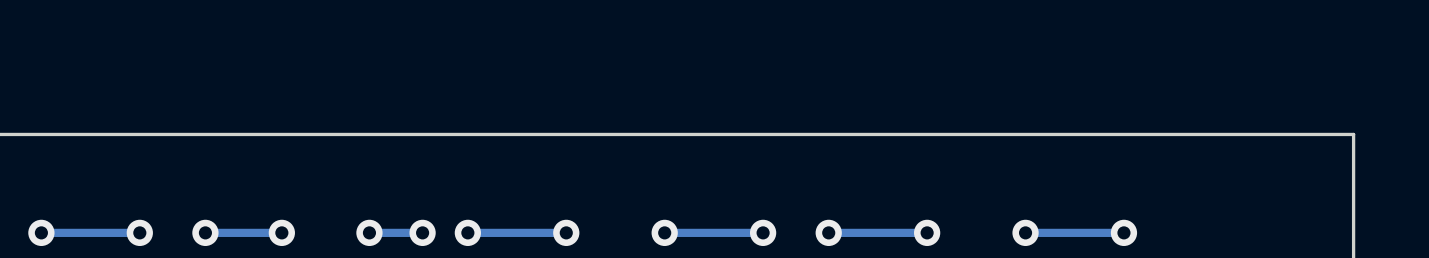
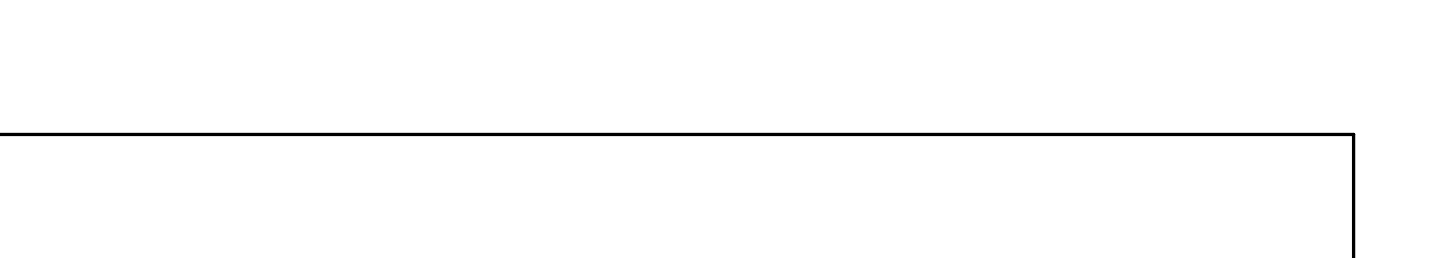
via: (41, 232) -> none
track: (139, 232) (41, 232) -> none
via: (139, 232) -> none
via: (205, 232) -> none
track: (281, 232) (205, 232) -> none
via: (281, 232) -> none
via: (369, 232) -> none
track: (422, 232) (369, 232) -> none
via: (422, 232) -> none
via: (467, 232) -> none
track: (566, 232) (467, 232) -> none
via: (566, 232) -> none
via: (664, 232) -> none
track: (763, 232) (664, 232) -> none
via: (763, 232) -> none
via: (828, 232) -> none
track: (927, 232) (828, 232) -> none
via: (927, 232) -> none
via: (1025, 232) -> none
track: (1123, 232) (1025, 232) -> none
via: (1123, 232) -> none

